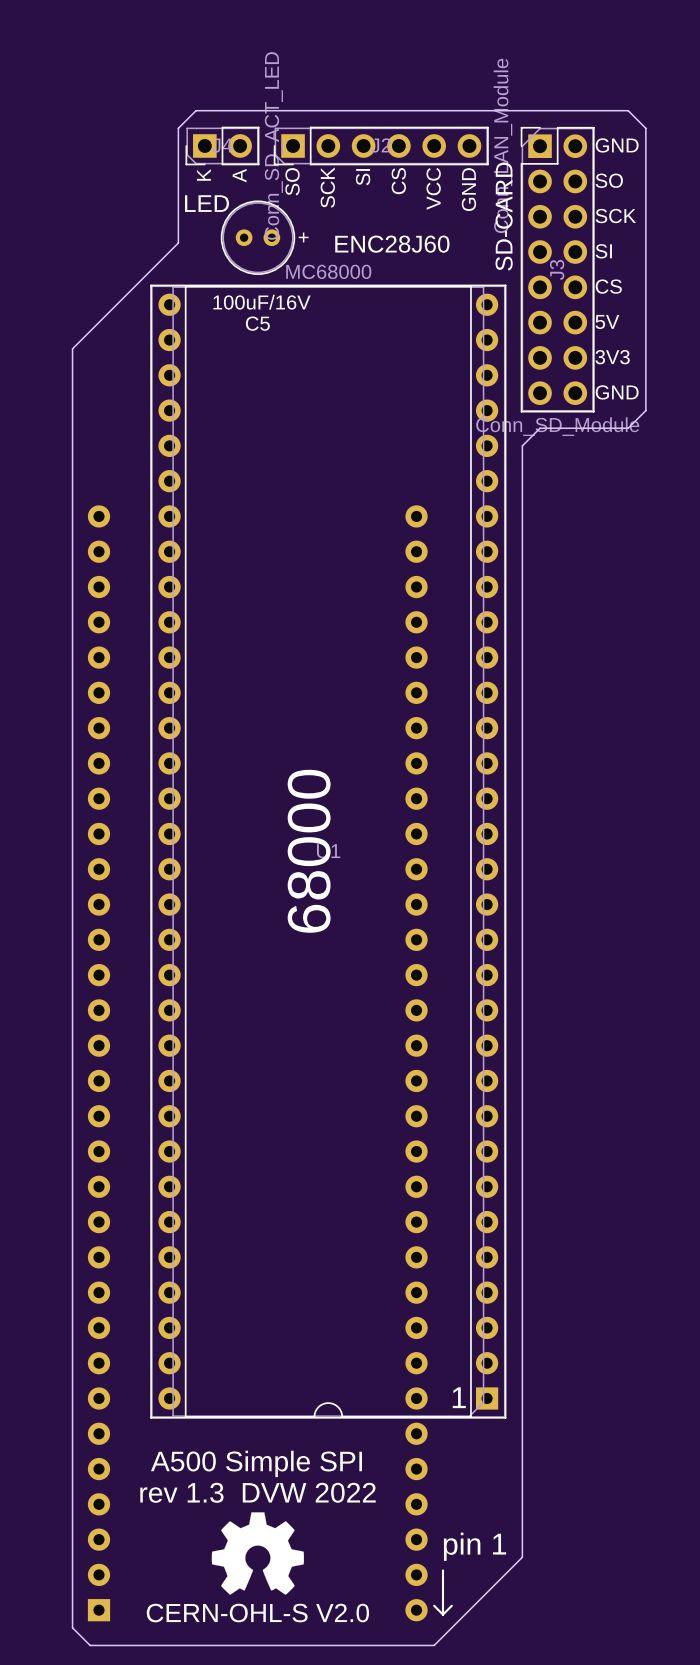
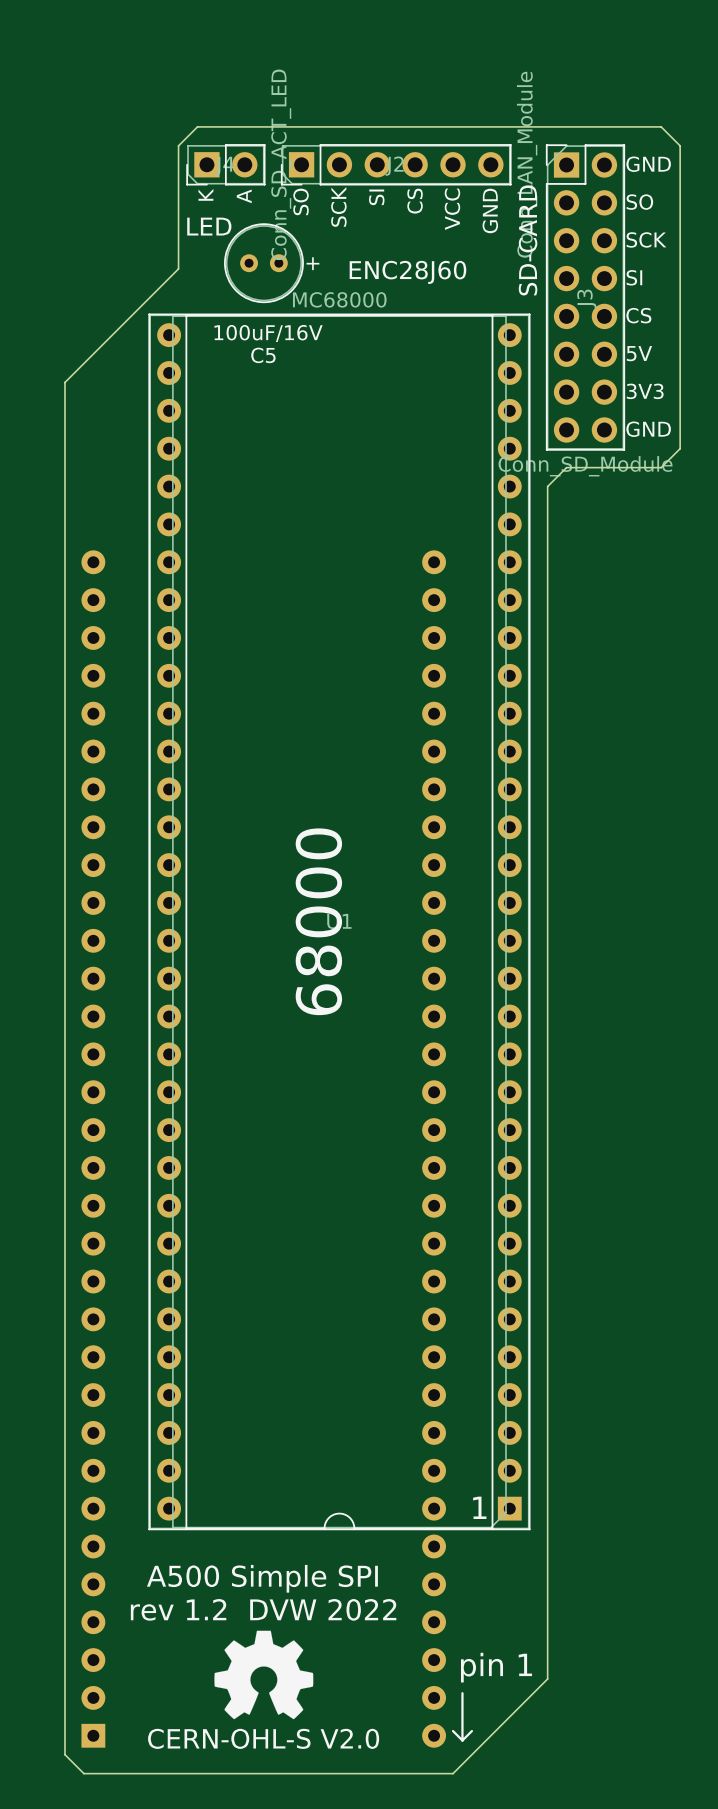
text: rev 1.3 DVW 2022 (257, 1492) -> rev 1.2 DVW 2022 (263, 1609)

